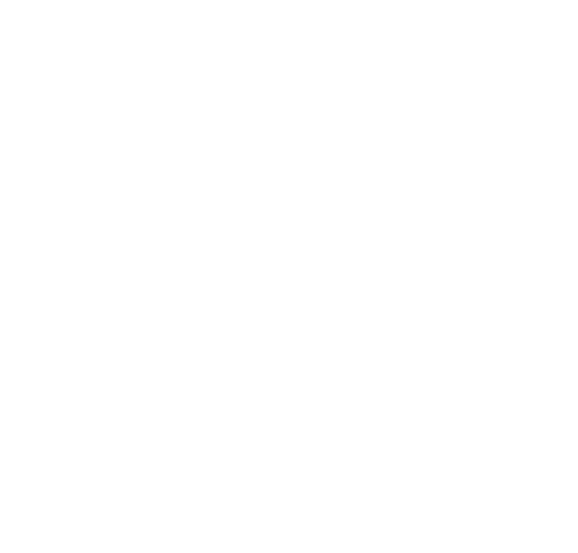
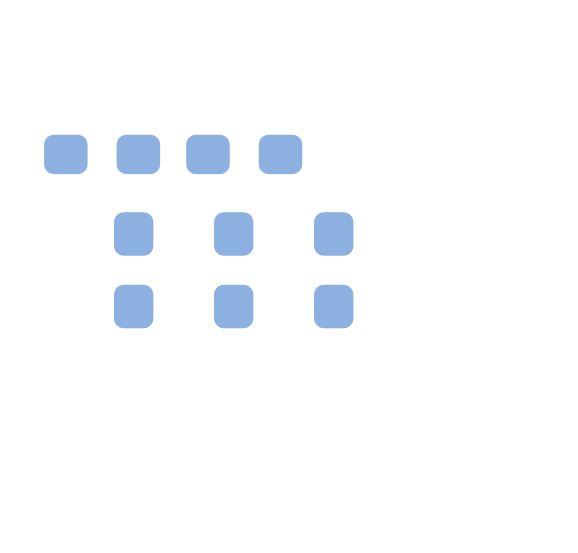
part: none -> (102, 154)
part: none -> (244, 154)
part: none -> (133, 270)
part: none -> (233, 270)
part: none -> (333, 270)

